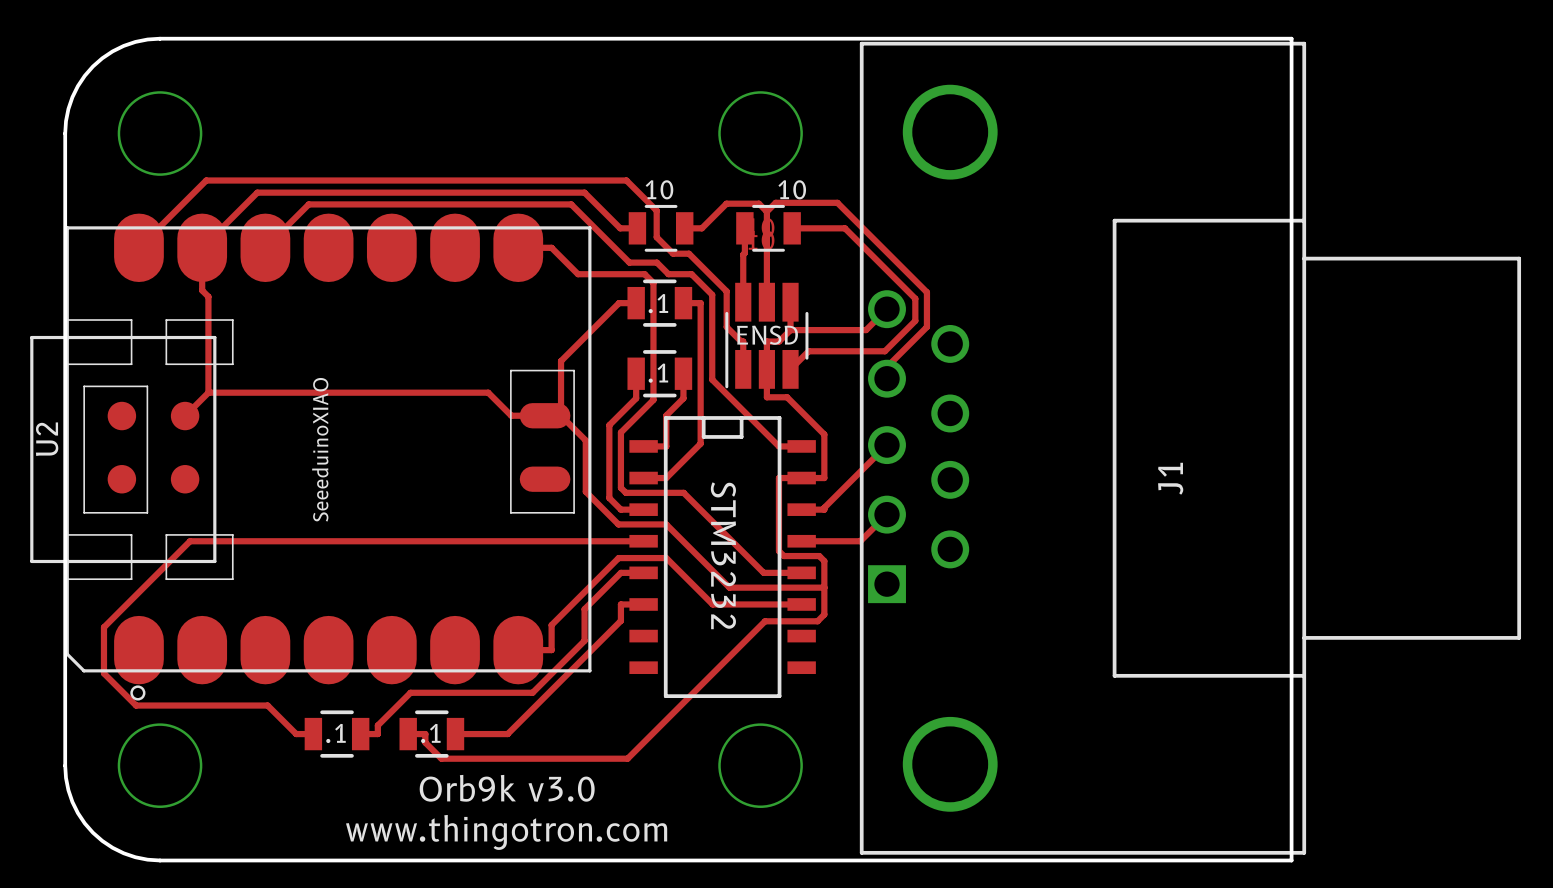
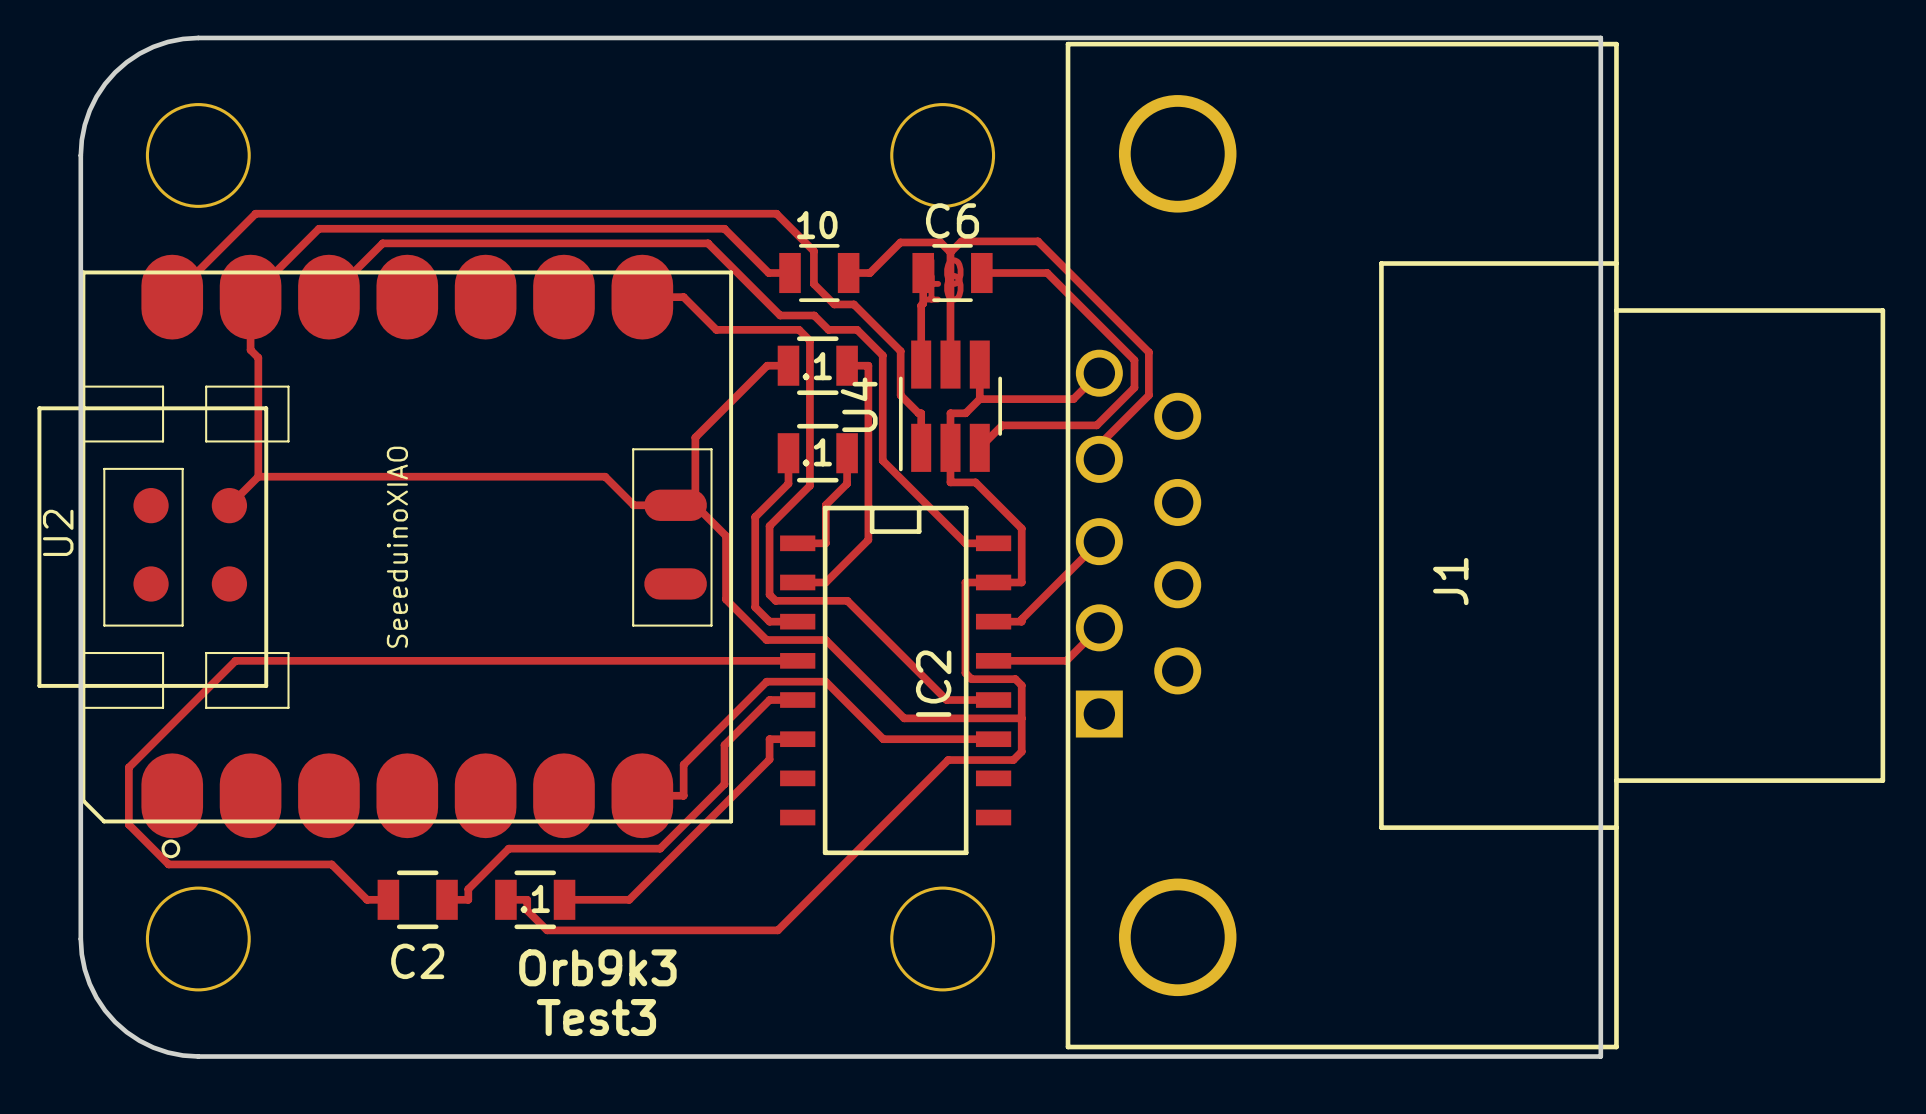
10 name: 10 (792, 189) -> C6 (952, 220)
ENSD name: ENSD (767, 335) -> U4 (859, 404)
STM3232 name: STM3232 (723, 555) -> IC2 (933, 683)
.1 name: .1 (336, 733) -> C2 (417, 961)
text: Orb9k v3.0 (507, 788) -> Orb9k3 (597, 967)
text: none -> Test3 (596, 1017)
text: www.thingotron.com (506, 832) -> none

